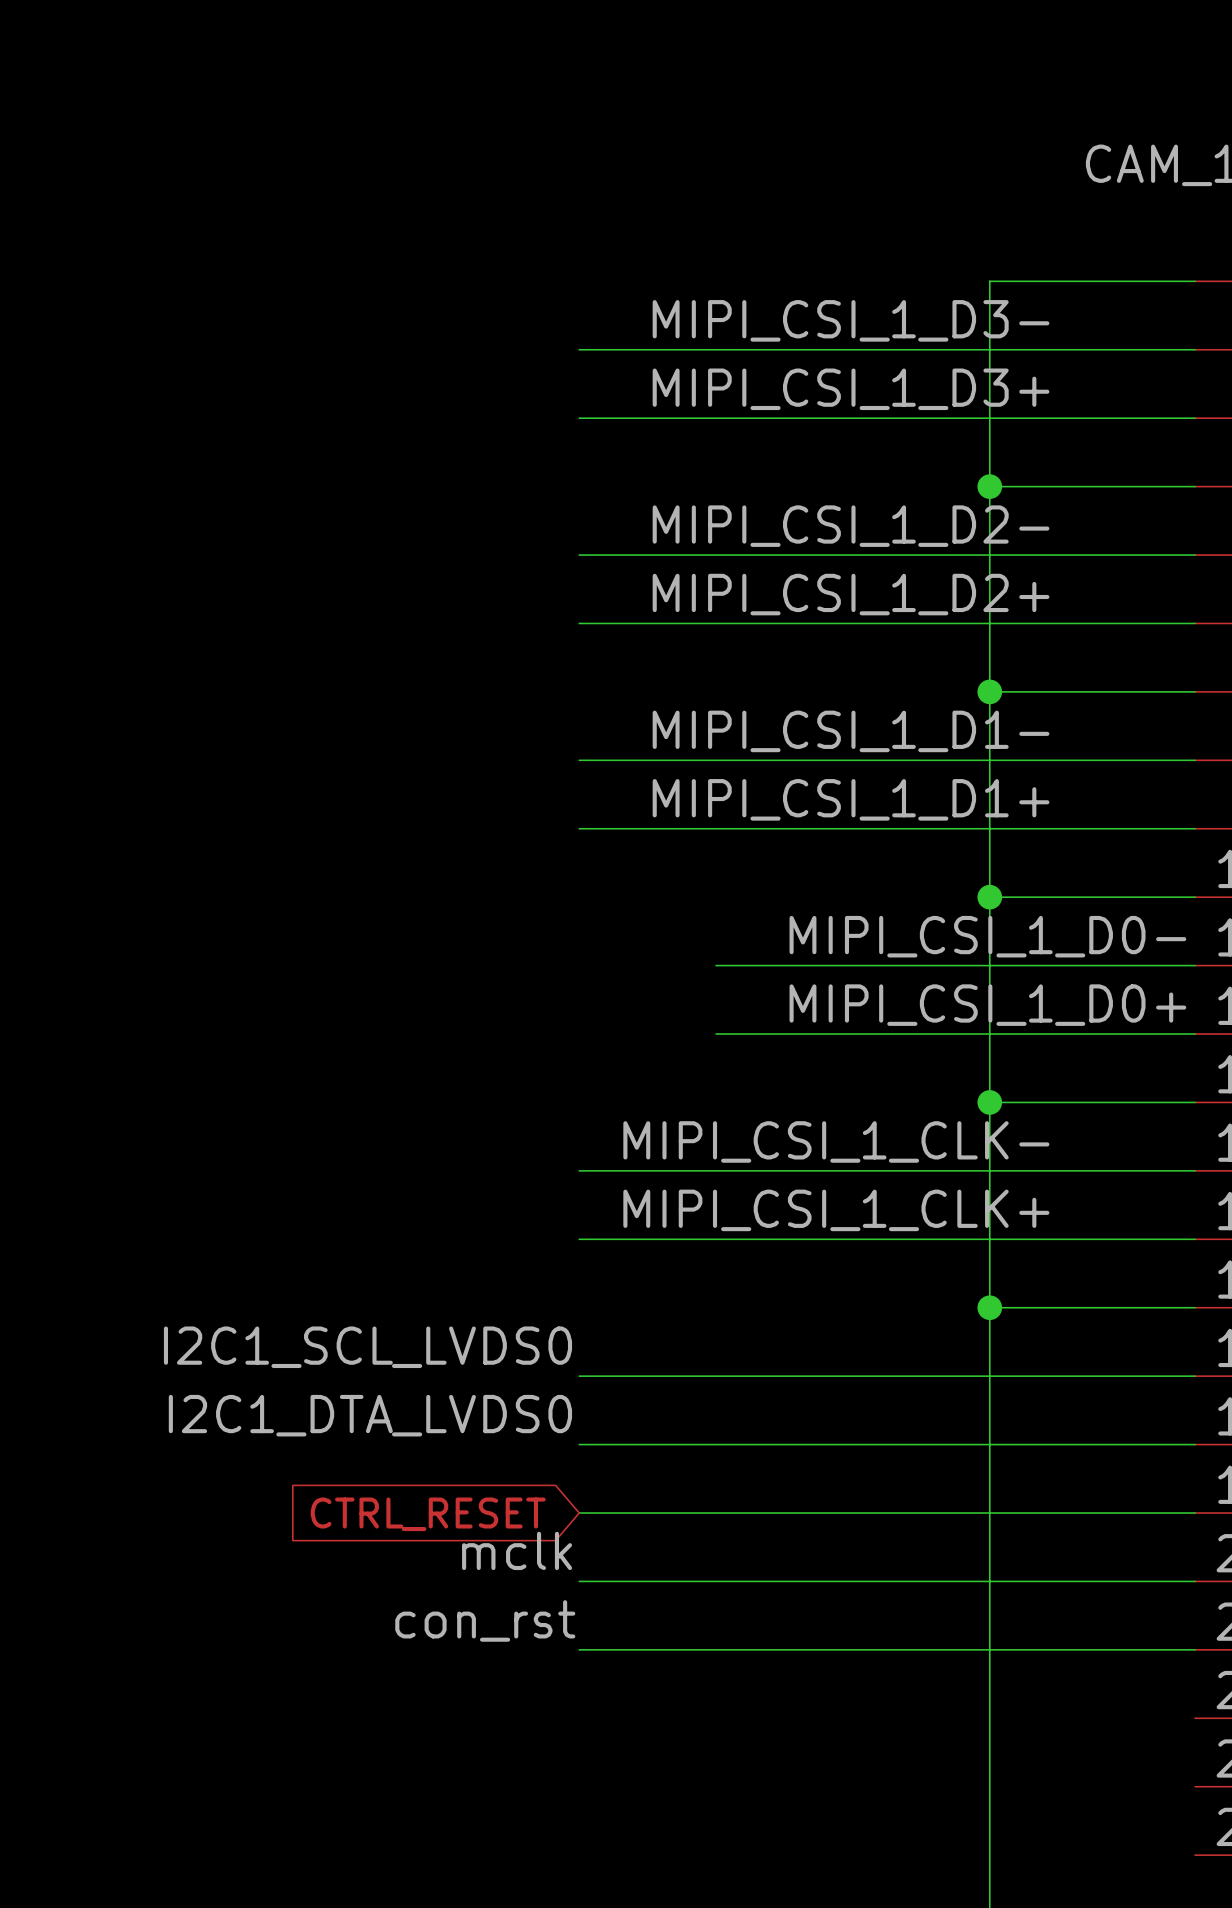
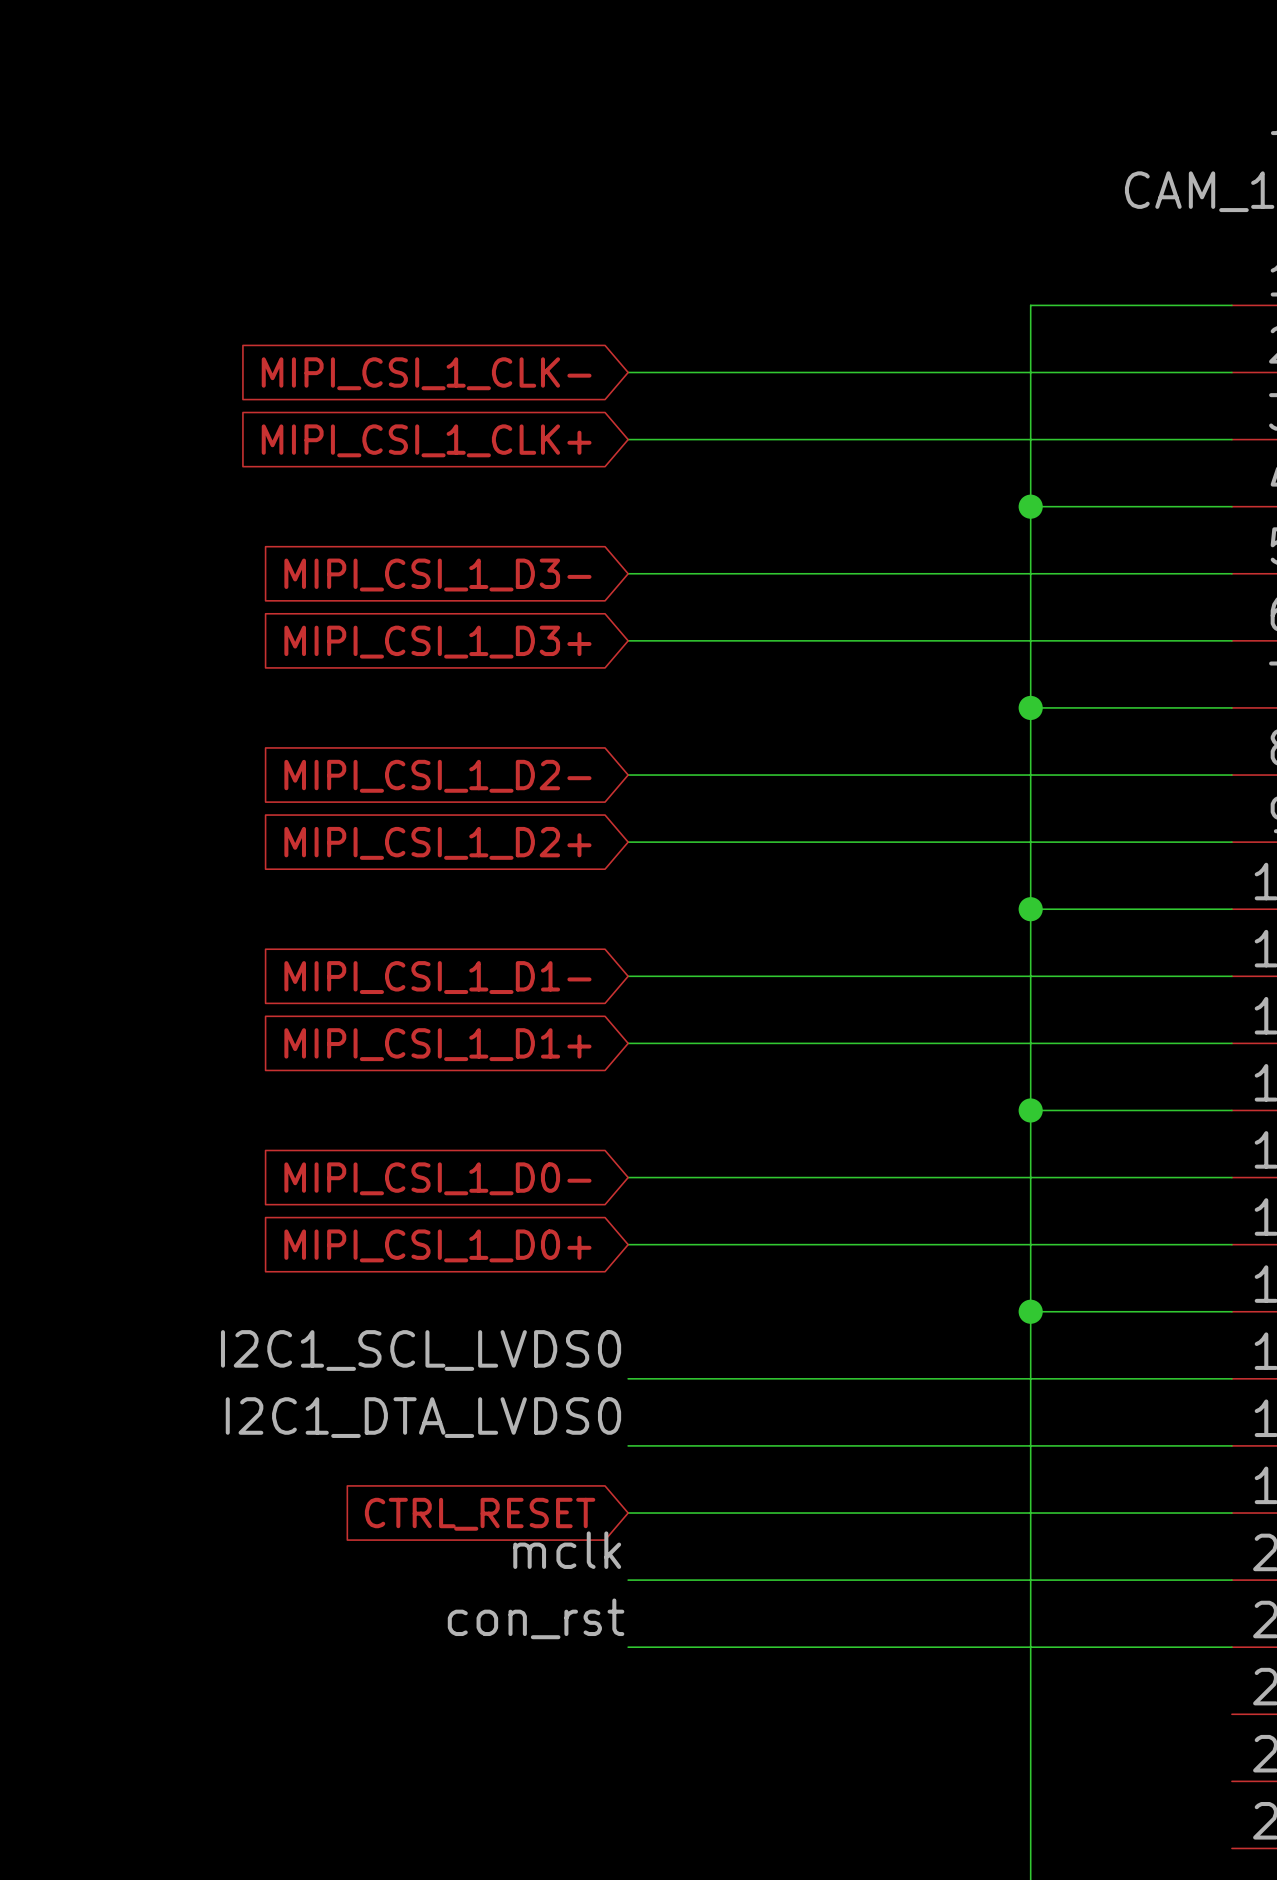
label: MIPI_CSI_1_D3- (851, 320) -> none
global label: none -> MIPI_CSI_1_CLK- (426, 373)
label: MIPI_CSI_1_D3+ (851, 389) -> none
global label: none -> MIPI_CSI_1_CLK+ (426, 440)
label: MIPI_CSI_1_D2- (851, 526) -> none
global label: none -> MIPI_CSI_1_D3- (437, 575)
label: MIPI_CSI_1_D2+ (851, 594) -> none
global label: none -> MIPI_CSI_1_D3+ (437, 642)
label: MIPI_CSI_1_D1- (851, 731) -> none
global label: none -> MIPI_CSI_1_D2- (437, 776)
label: MIPI_CSI_1_D1+ (851, 799) -> none
global label: none -> MIPI_CSI_1_D2+ (437, 843)
label: MIPI_CSI_1_D0- (987, 936) -> none
wire: none -> (628, 976) (762, 976)
global label: none -> MIPI_CSI_1_D1- (437, 977)
label: MIPI_CSI_1_D0+ (987, 1005) -> none
wire: none -> (628, 1043) (762, 1043)
global label: none -> MIPI_CSI_1_D1+ (437, 1044)
label: MIPI_CSI_1_CLK- (836, 1141) -> none
global label: none -> MIPI_CSI_1_D0- (437, 1178)
label: MIPI_CSI_1_CLK+ (836, 1210) -> none
global label: none -> MIPI_CSI_1_D0+ (437, 1245)

